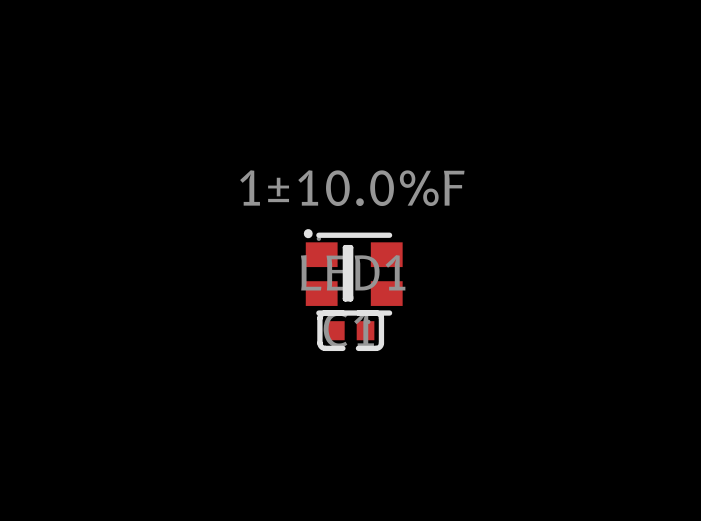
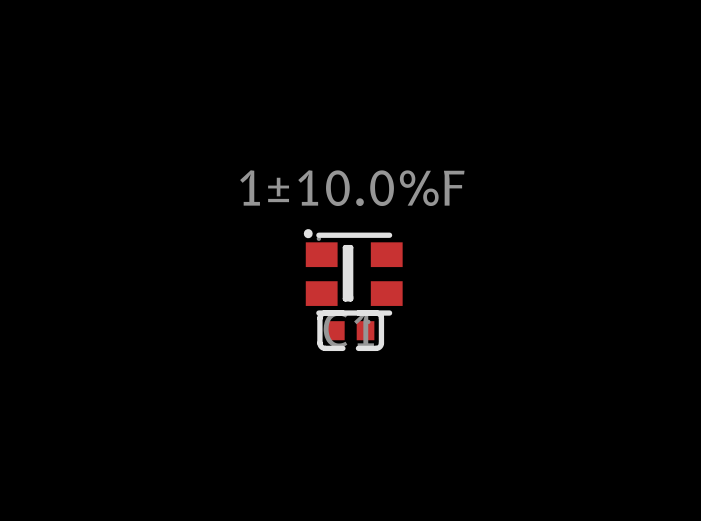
LED1 name: LED1 (353, 272) -> none

